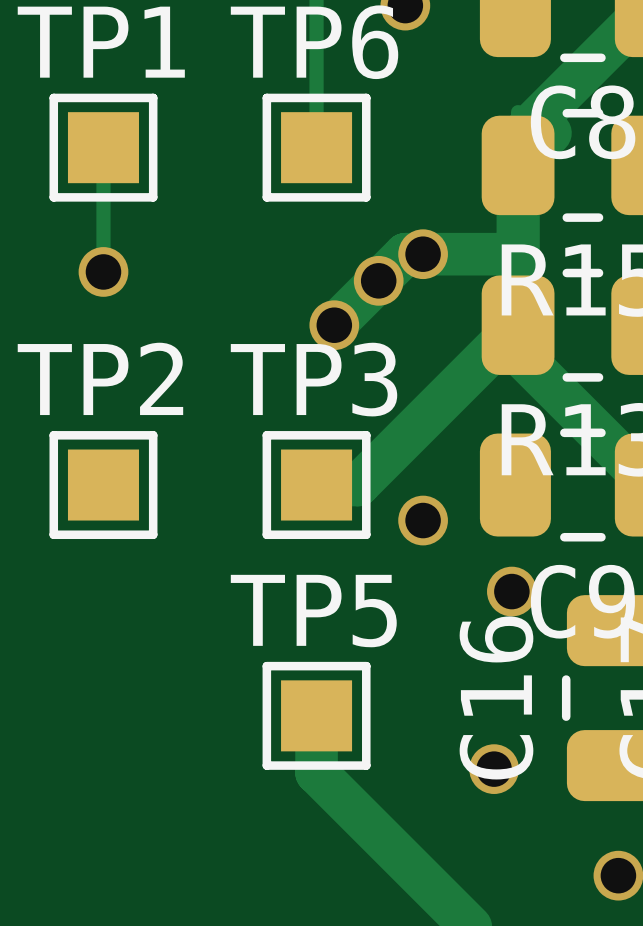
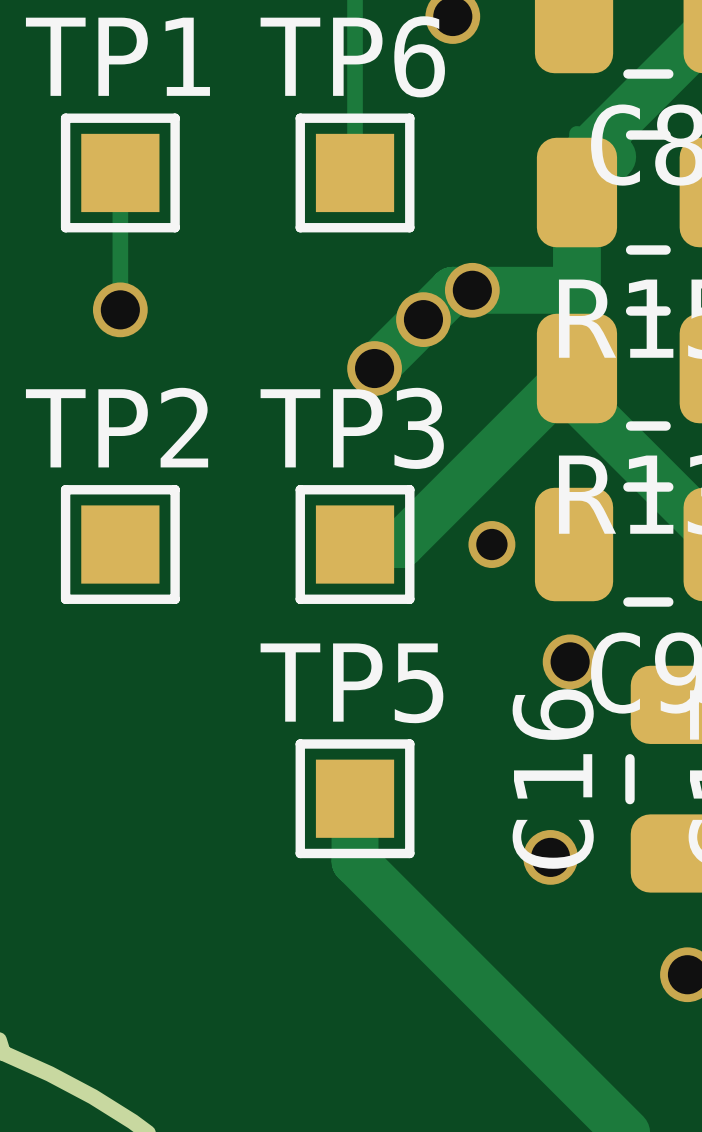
via position: (423, 520) -> (491, 544)

